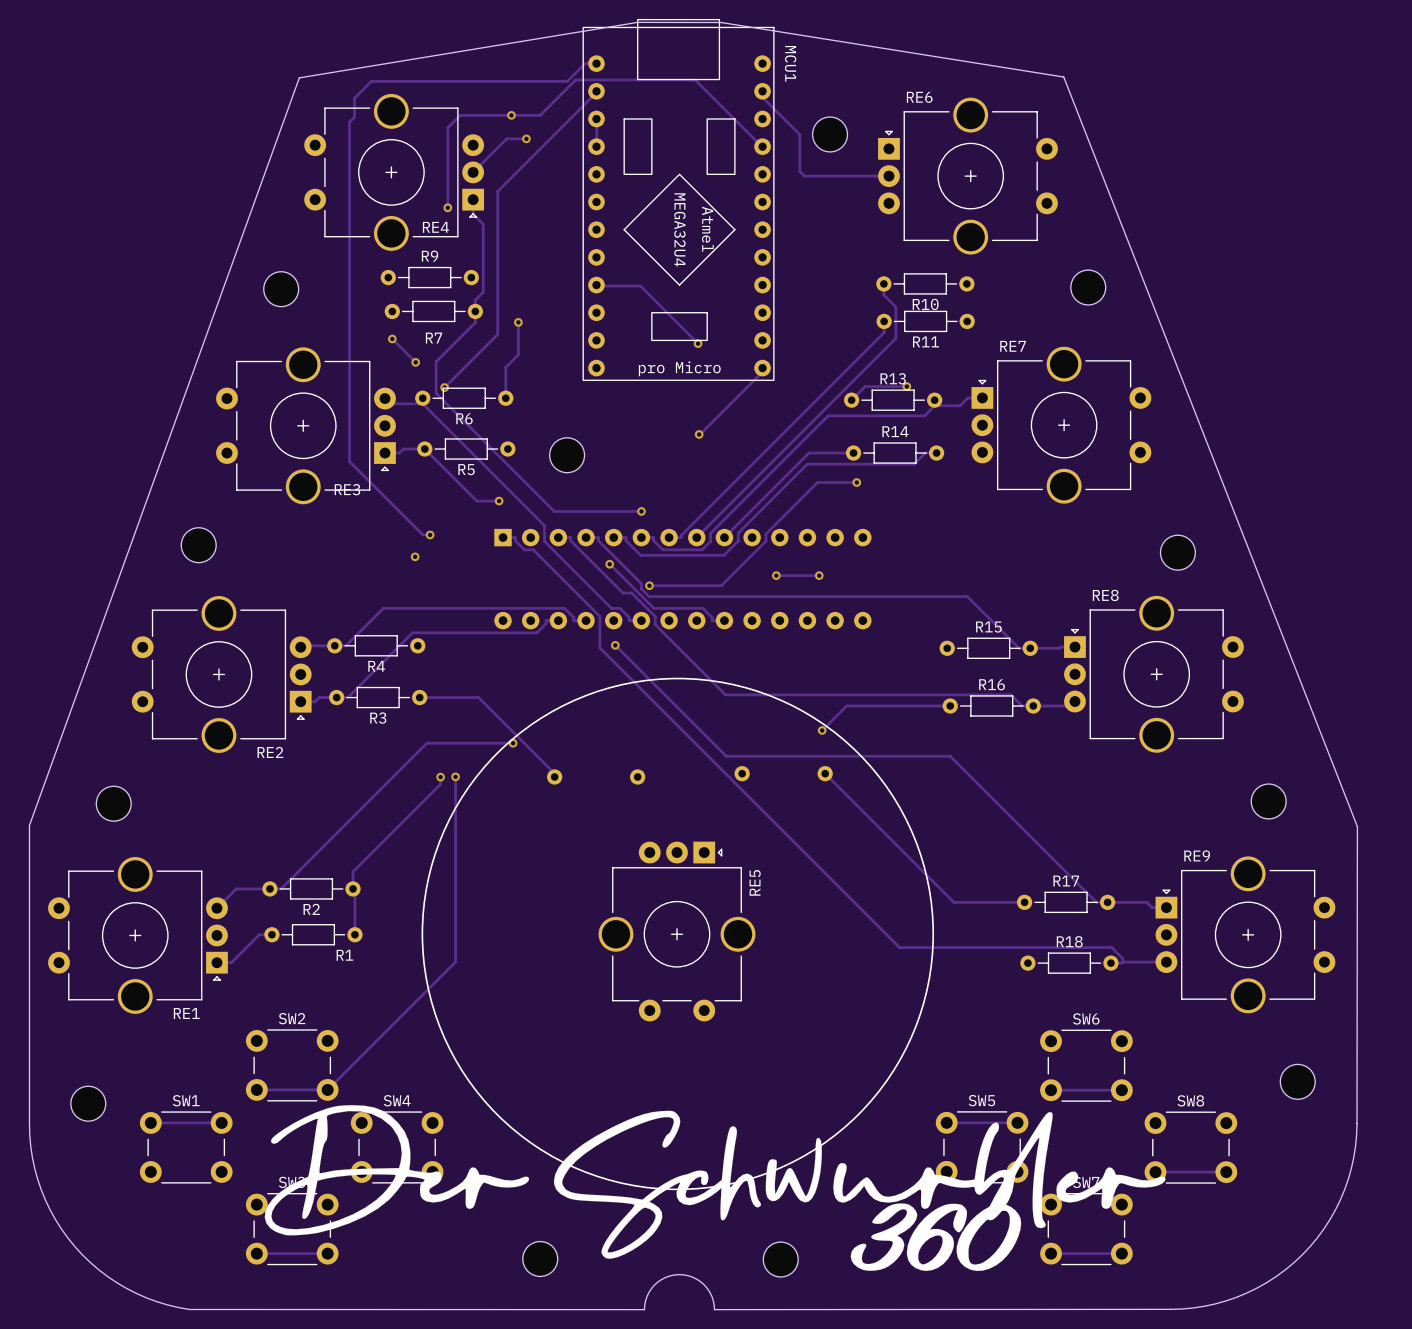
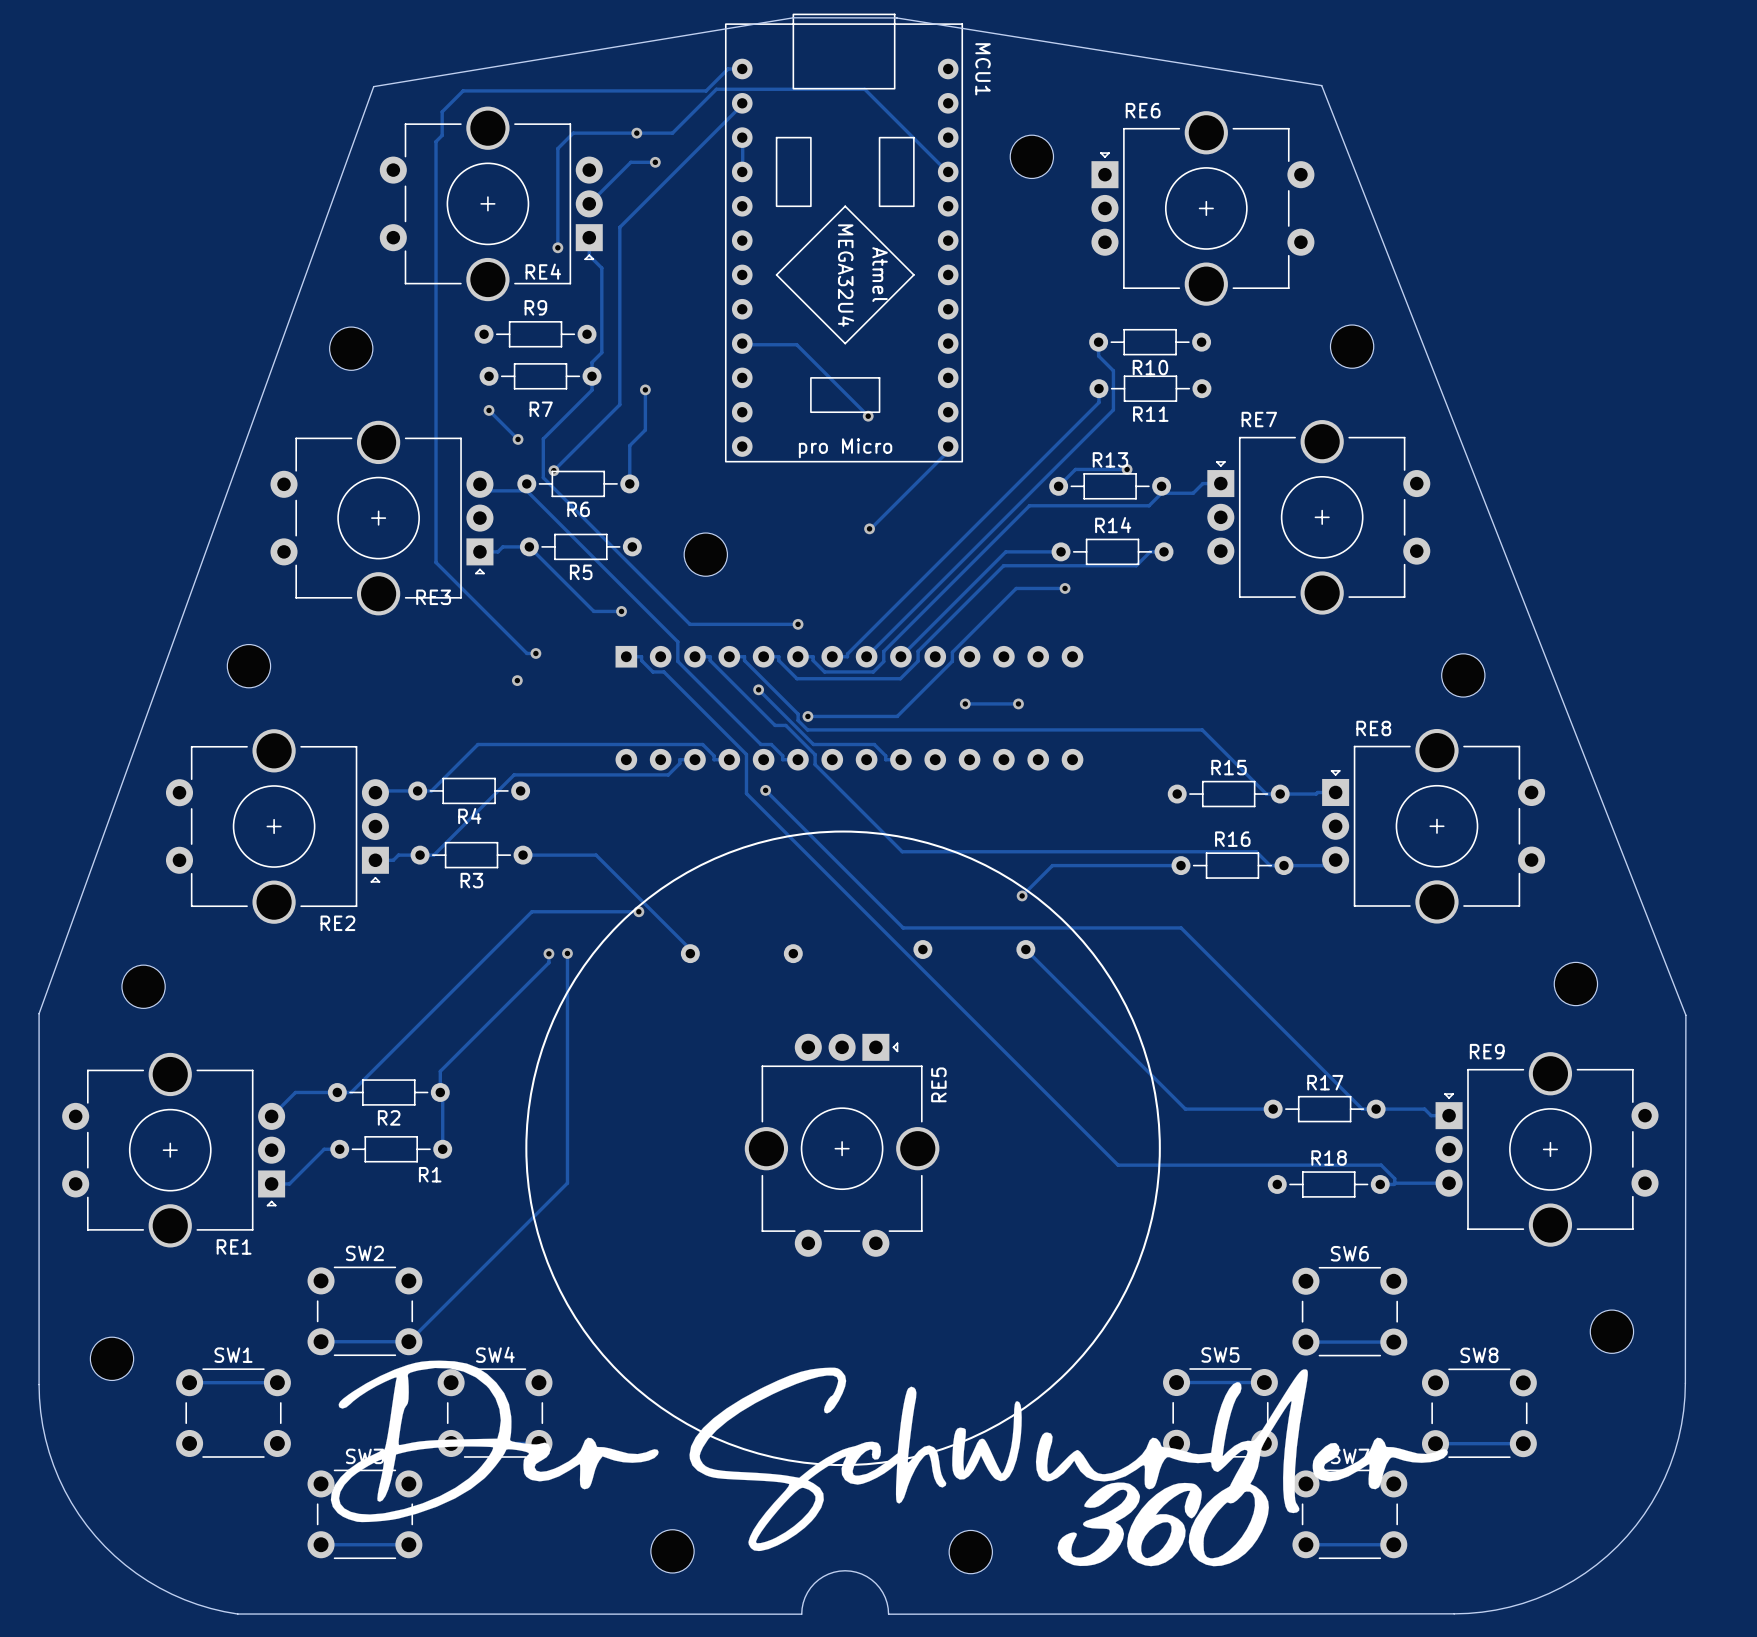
track: (762, 91) (762, 97) (799, 134) (799, 171) (804, 176) (888, 176) -> none

